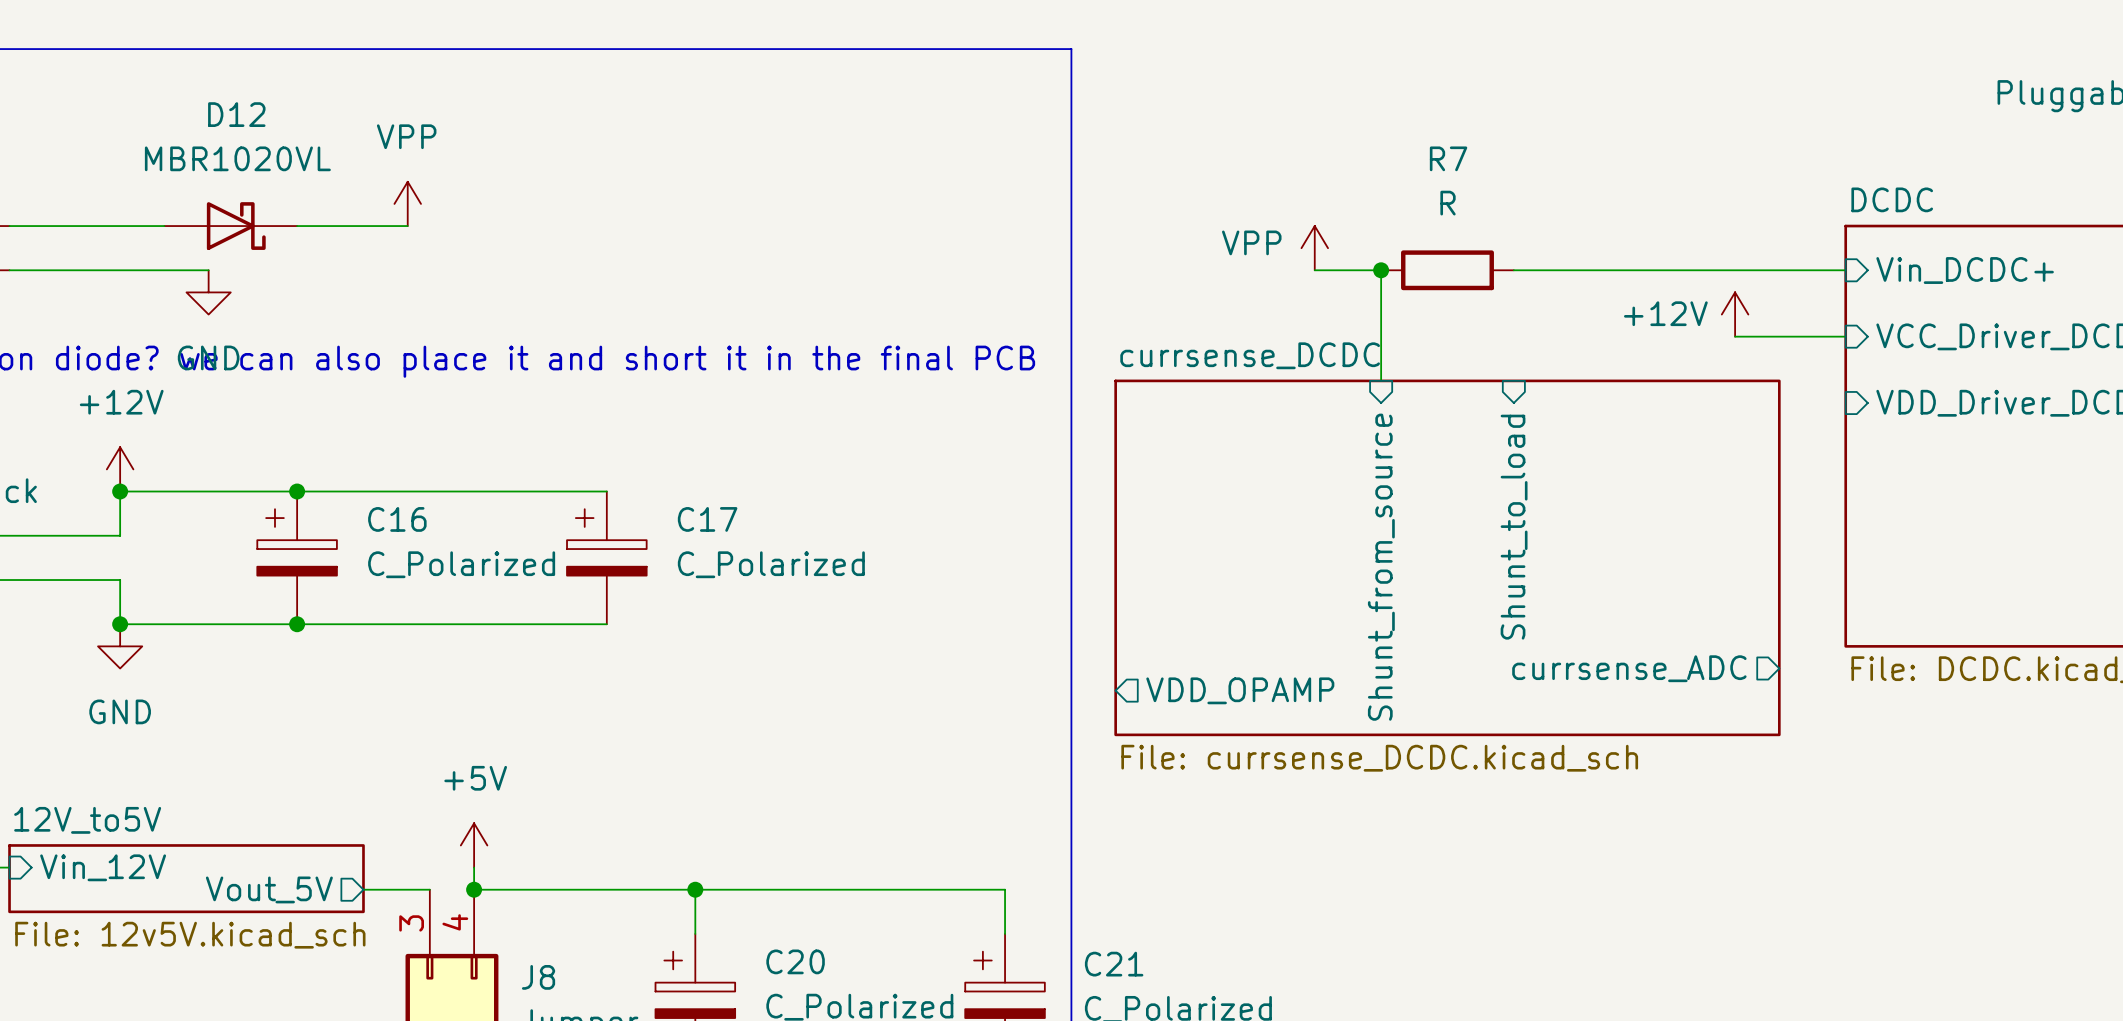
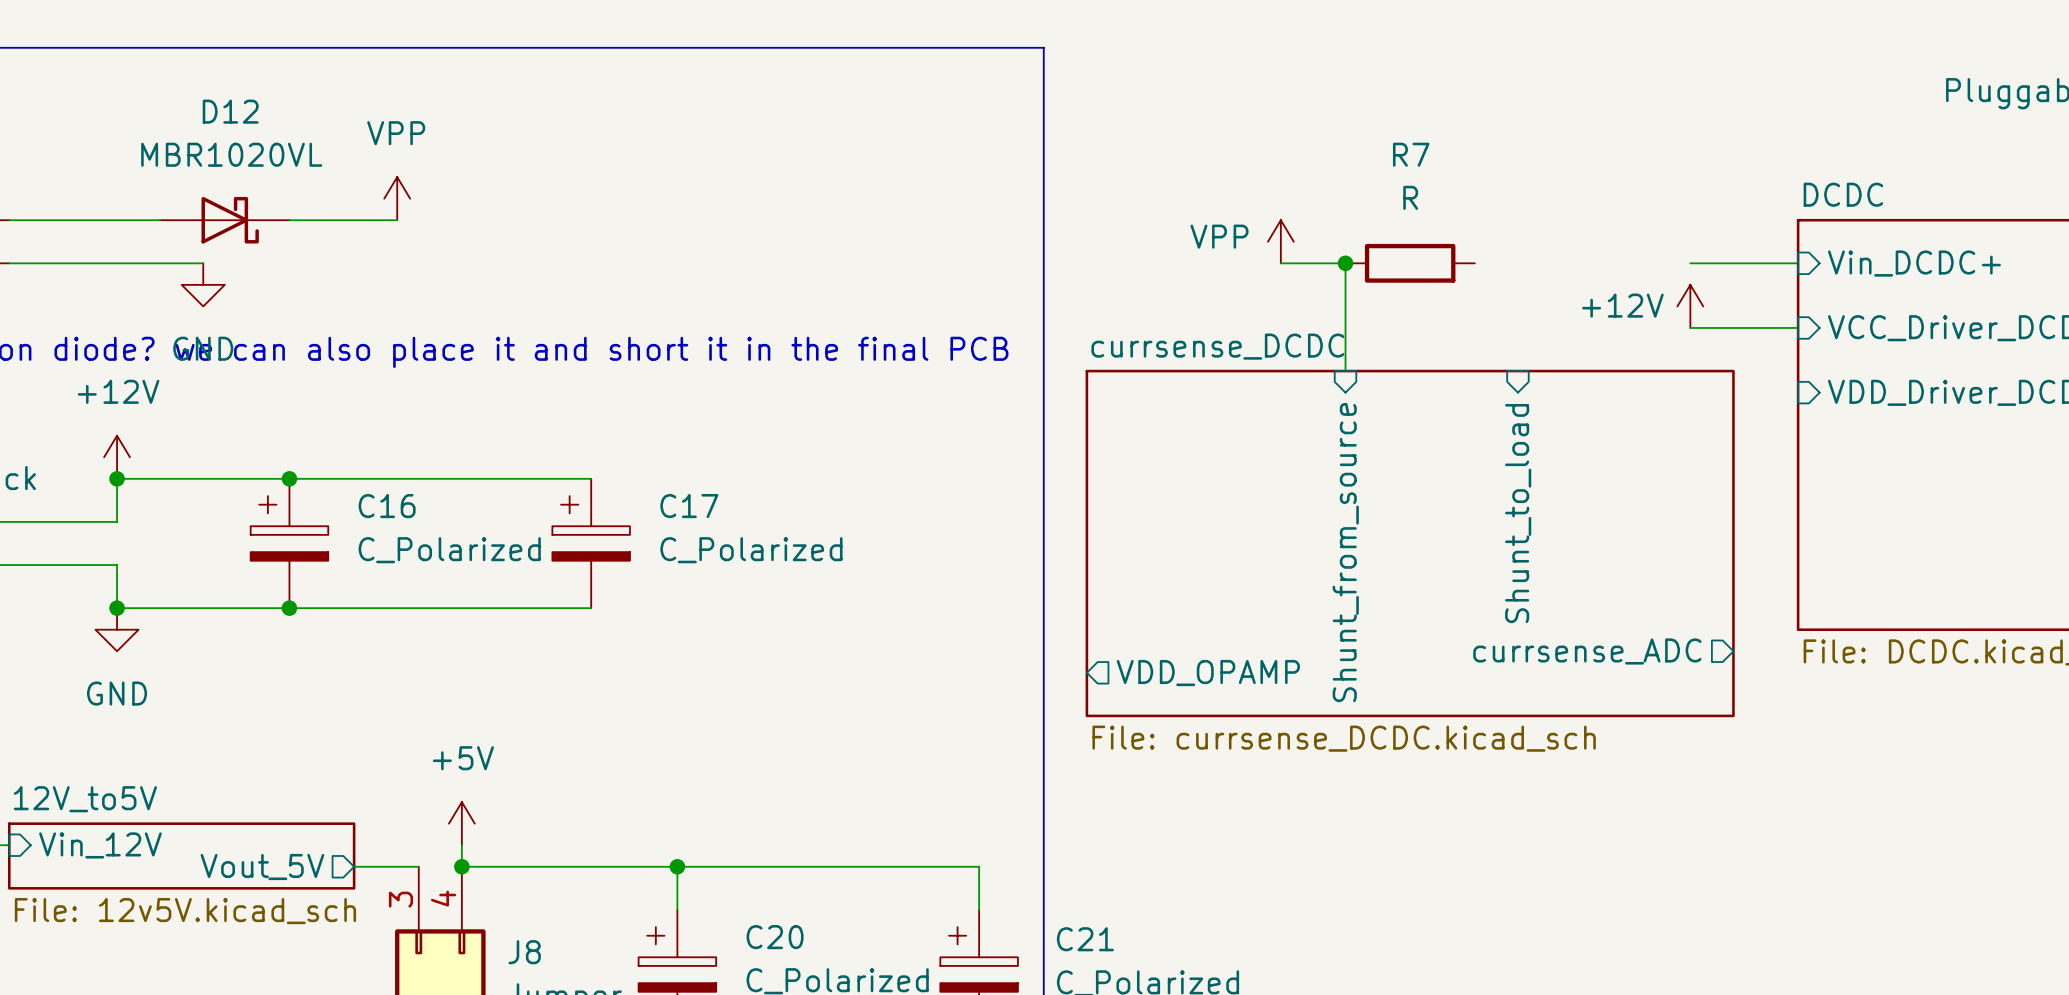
wire: (1513, 270) (1735, 270) -> none
sheet pin position: Shunt_to_load (1514, 527) -> Shunt_to_load (1518, 513)

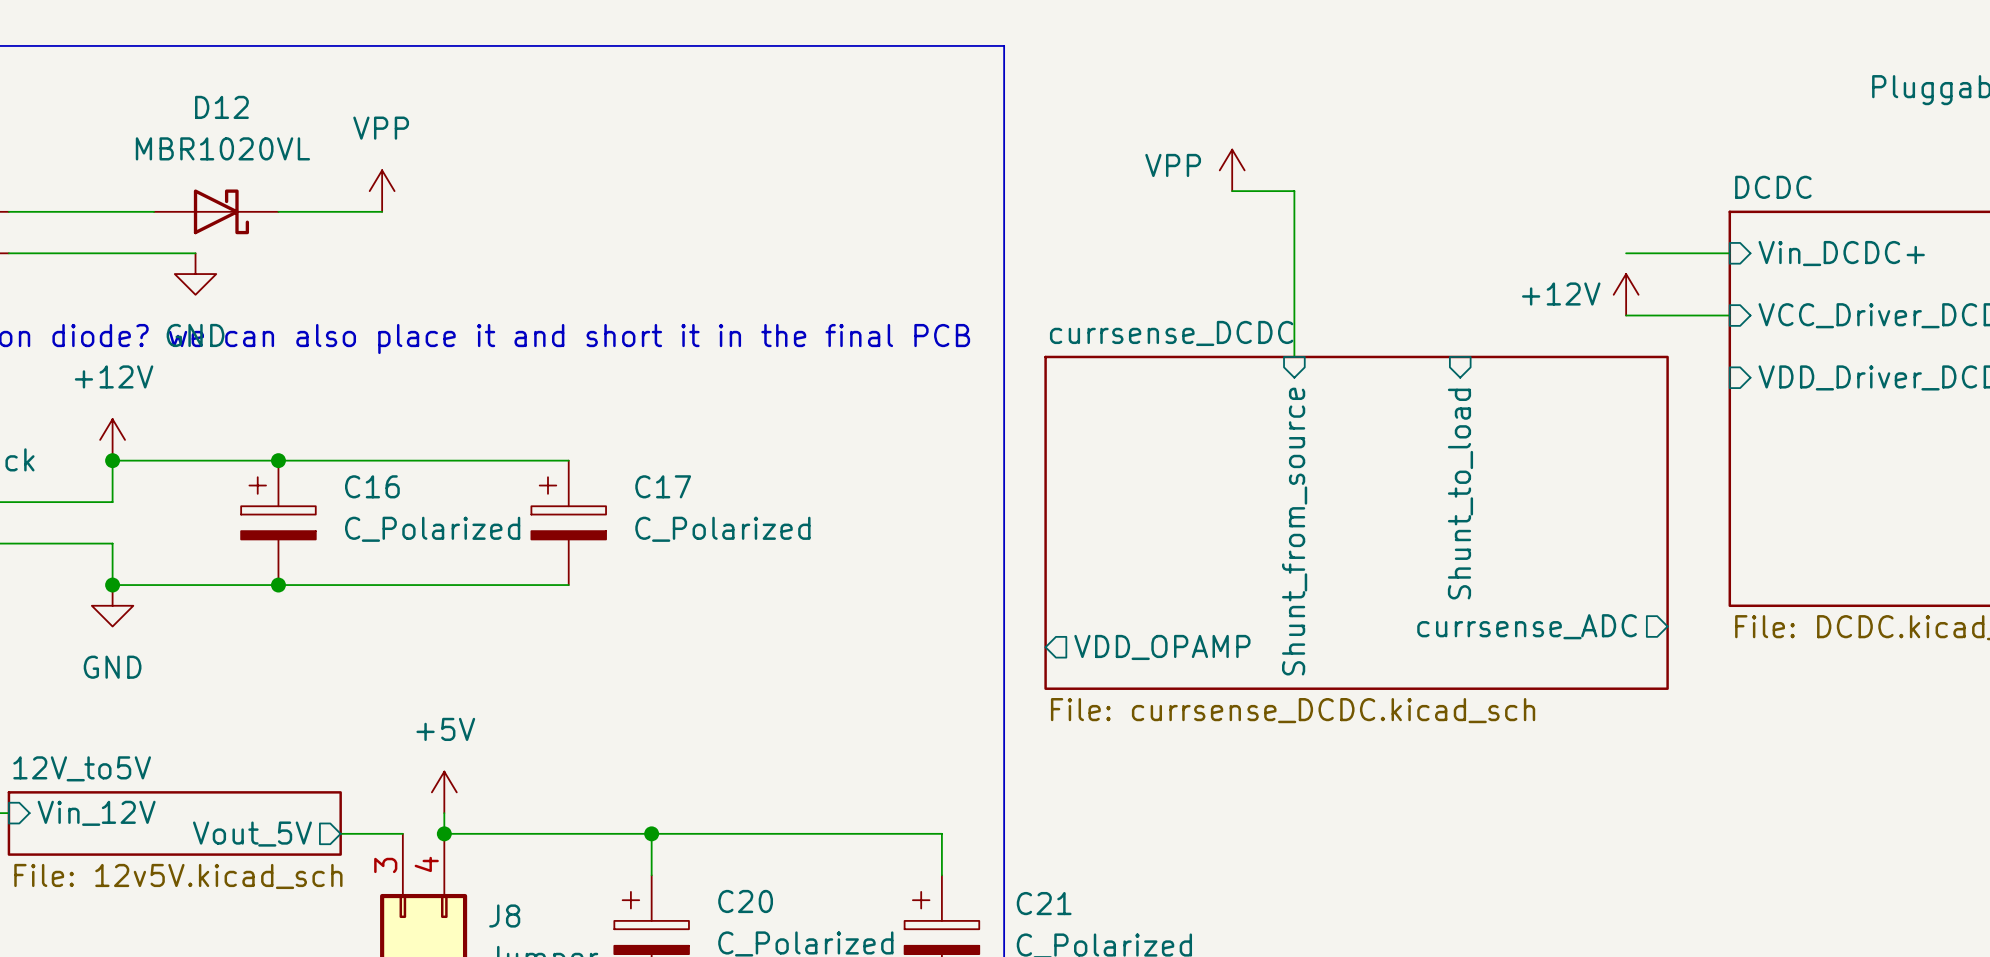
power symbol position: VPP (1280, 241) -> VPP (1232, 170)
wire: (1280, 263) (1345, 263) -> (1232, 191) (1294, 191) (1294, 253)
junction: (1345, 263) -> none
R7: R (1410, 263) -> none

